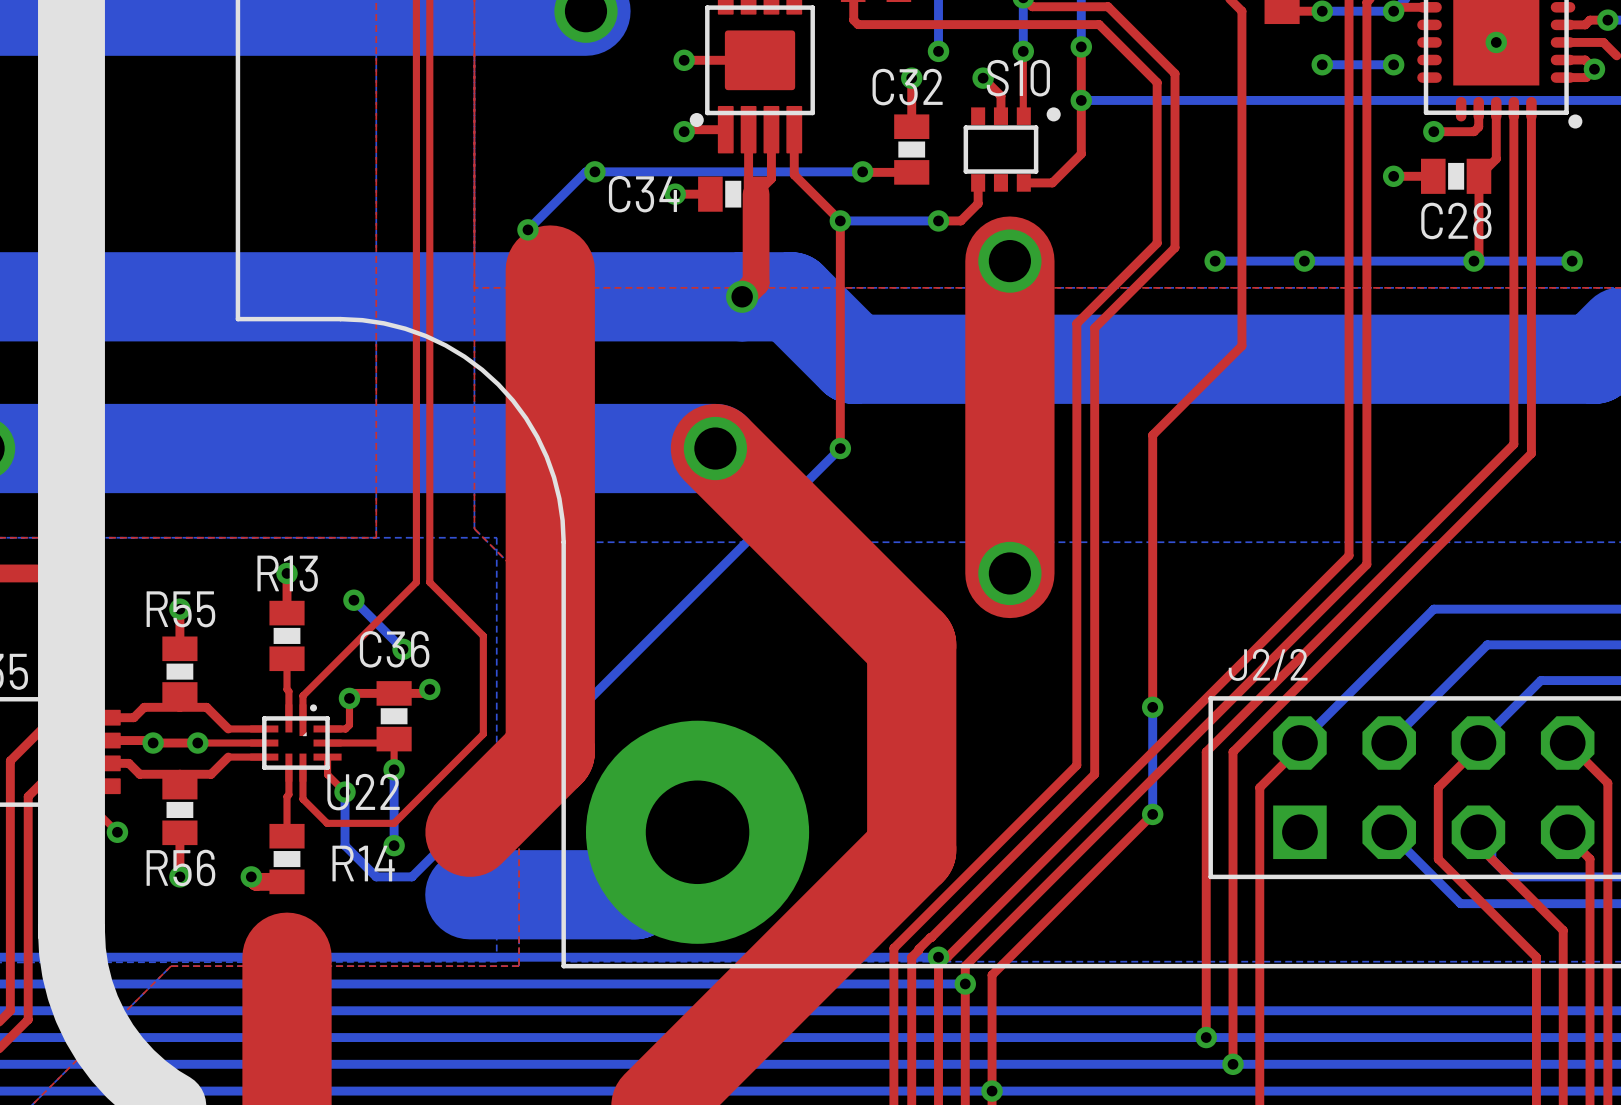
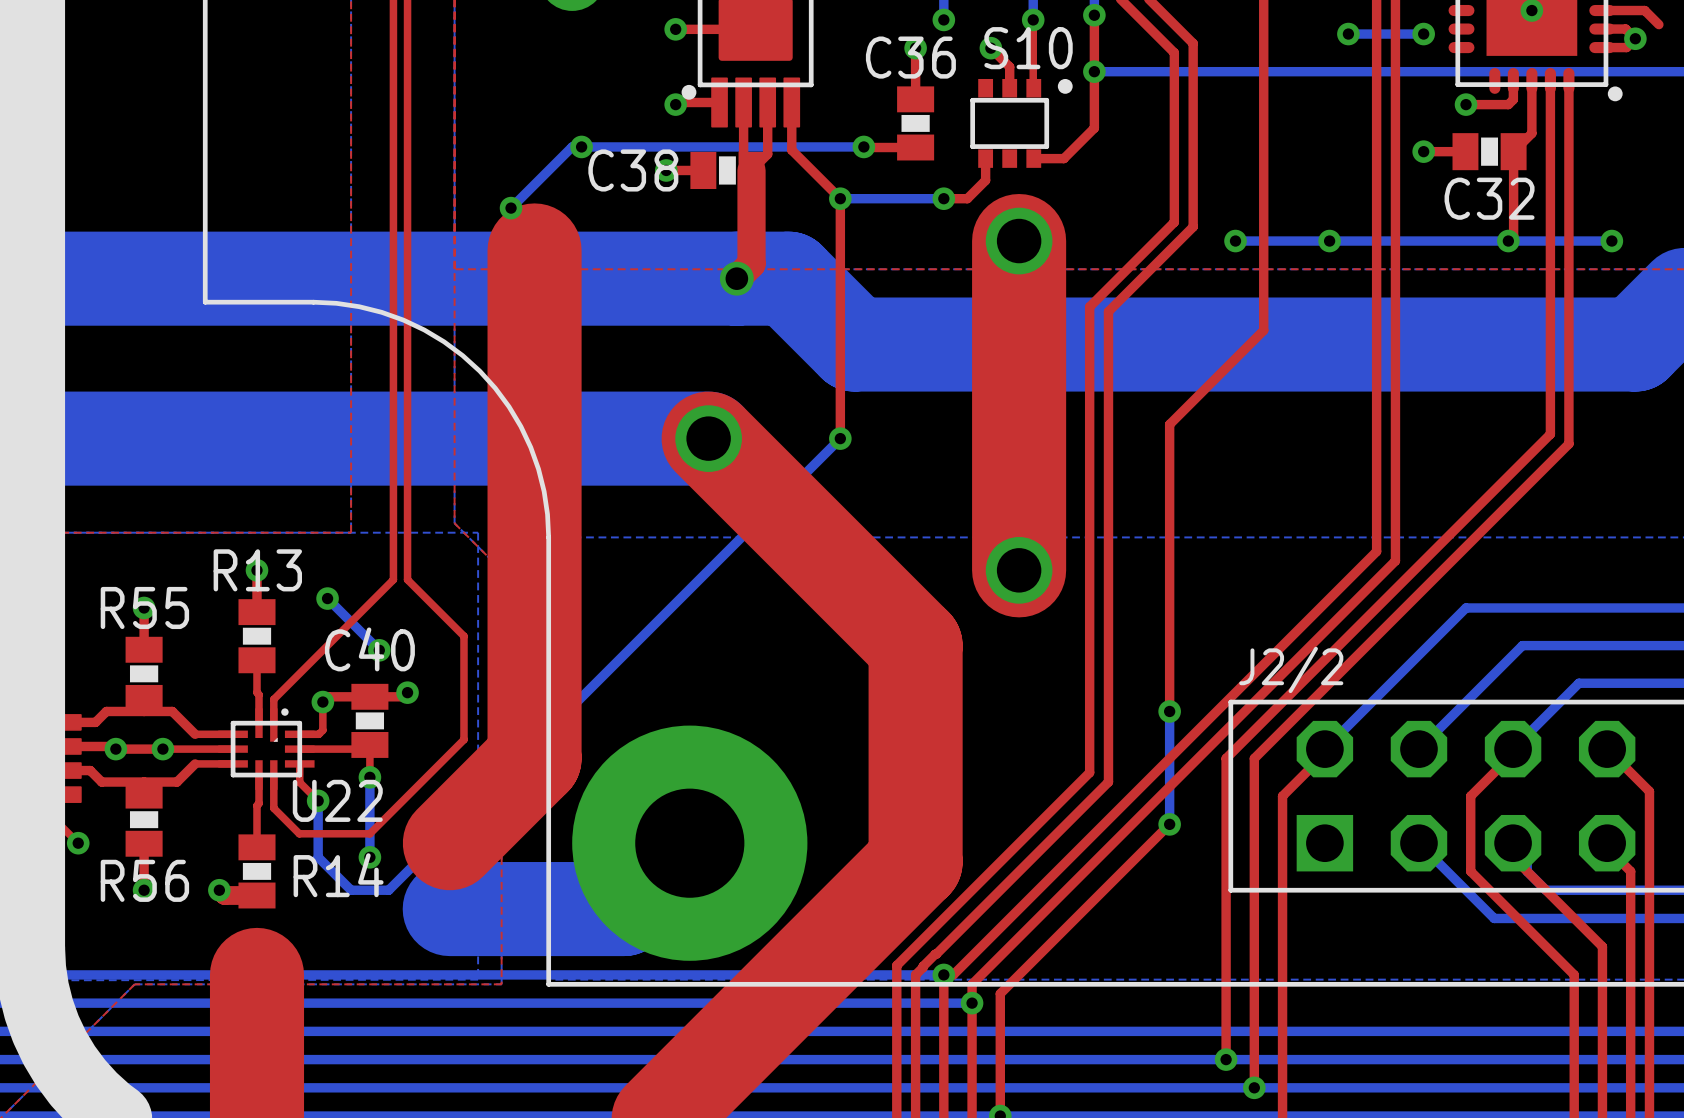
C32 name: C32 (907, 87) -> C36 (910, 57)
C34 name: C34 (644, 194) -> C38 (633, 170)
C28 name: C28 (1456, 220) -> C32 (1489, 198)
C36 name: C36 (394, 649) -> C40 (369, 649)

